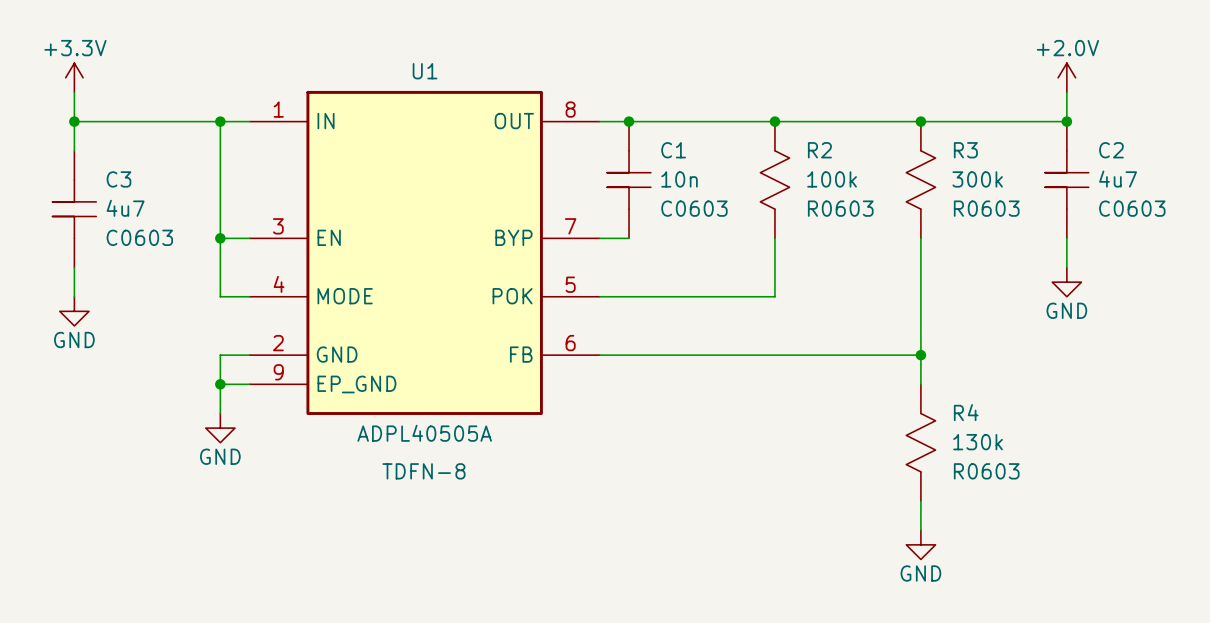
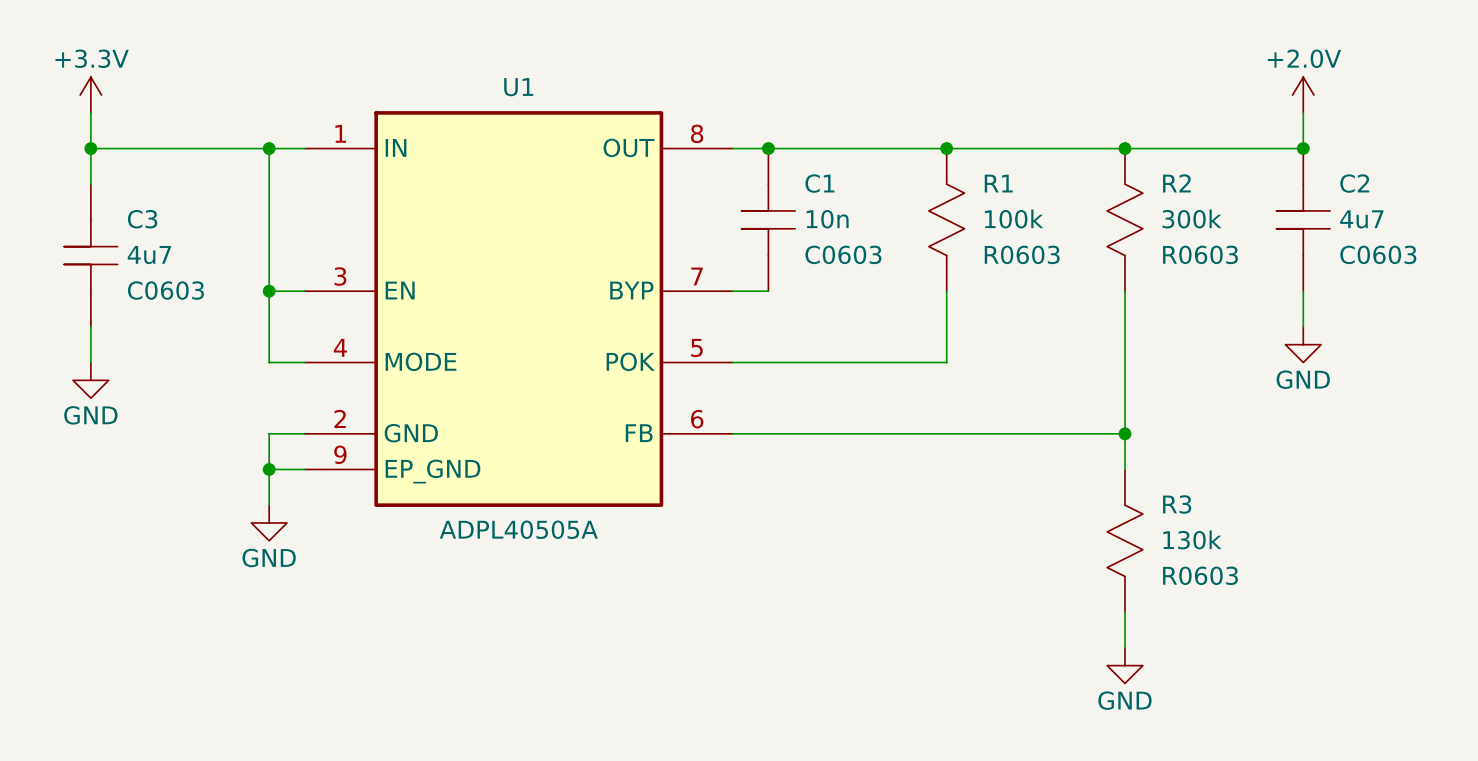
R2 name: R2 (819, 150) -> R1 (998, 183)
R3 name: R3 (965, 150) -> R2 (1176, 183)
R4 name: R4 (966, 412) -> R3 (1177, 504)
U1 text: TDFN-8 (423, 471) -> none

